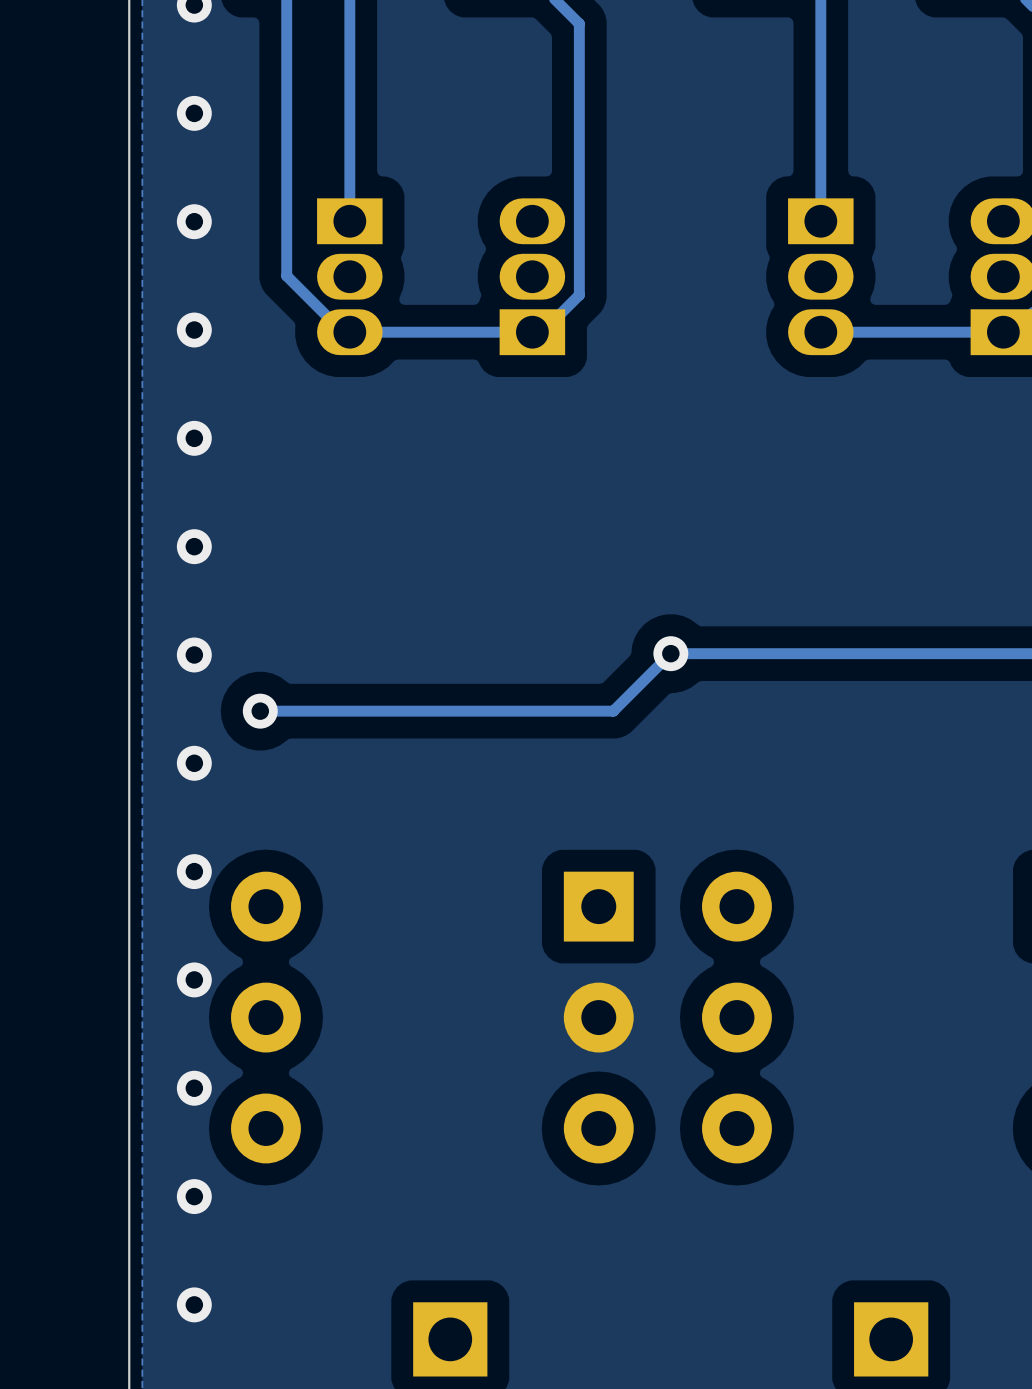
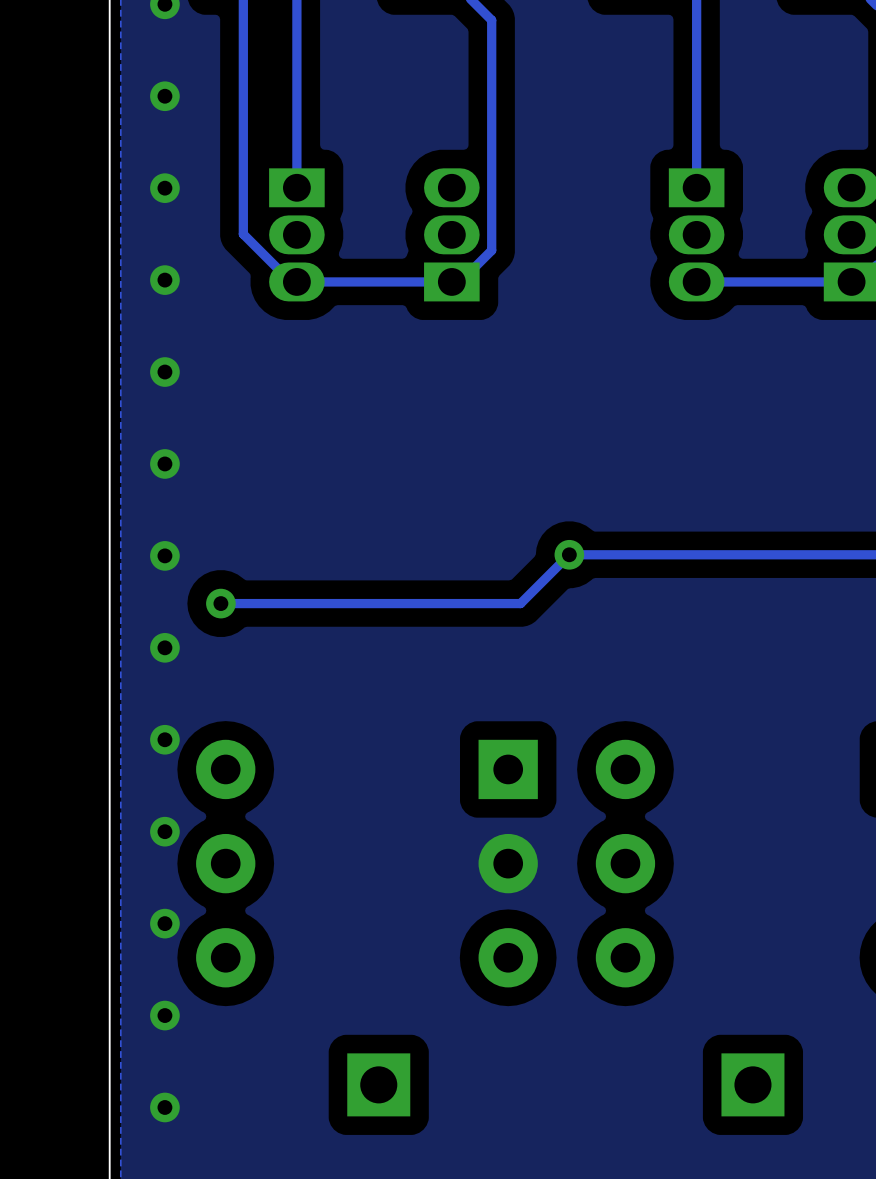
part position: (450, 1339) -> (378, 1084)
part position: (891, 1339) -> (752, 1084)

